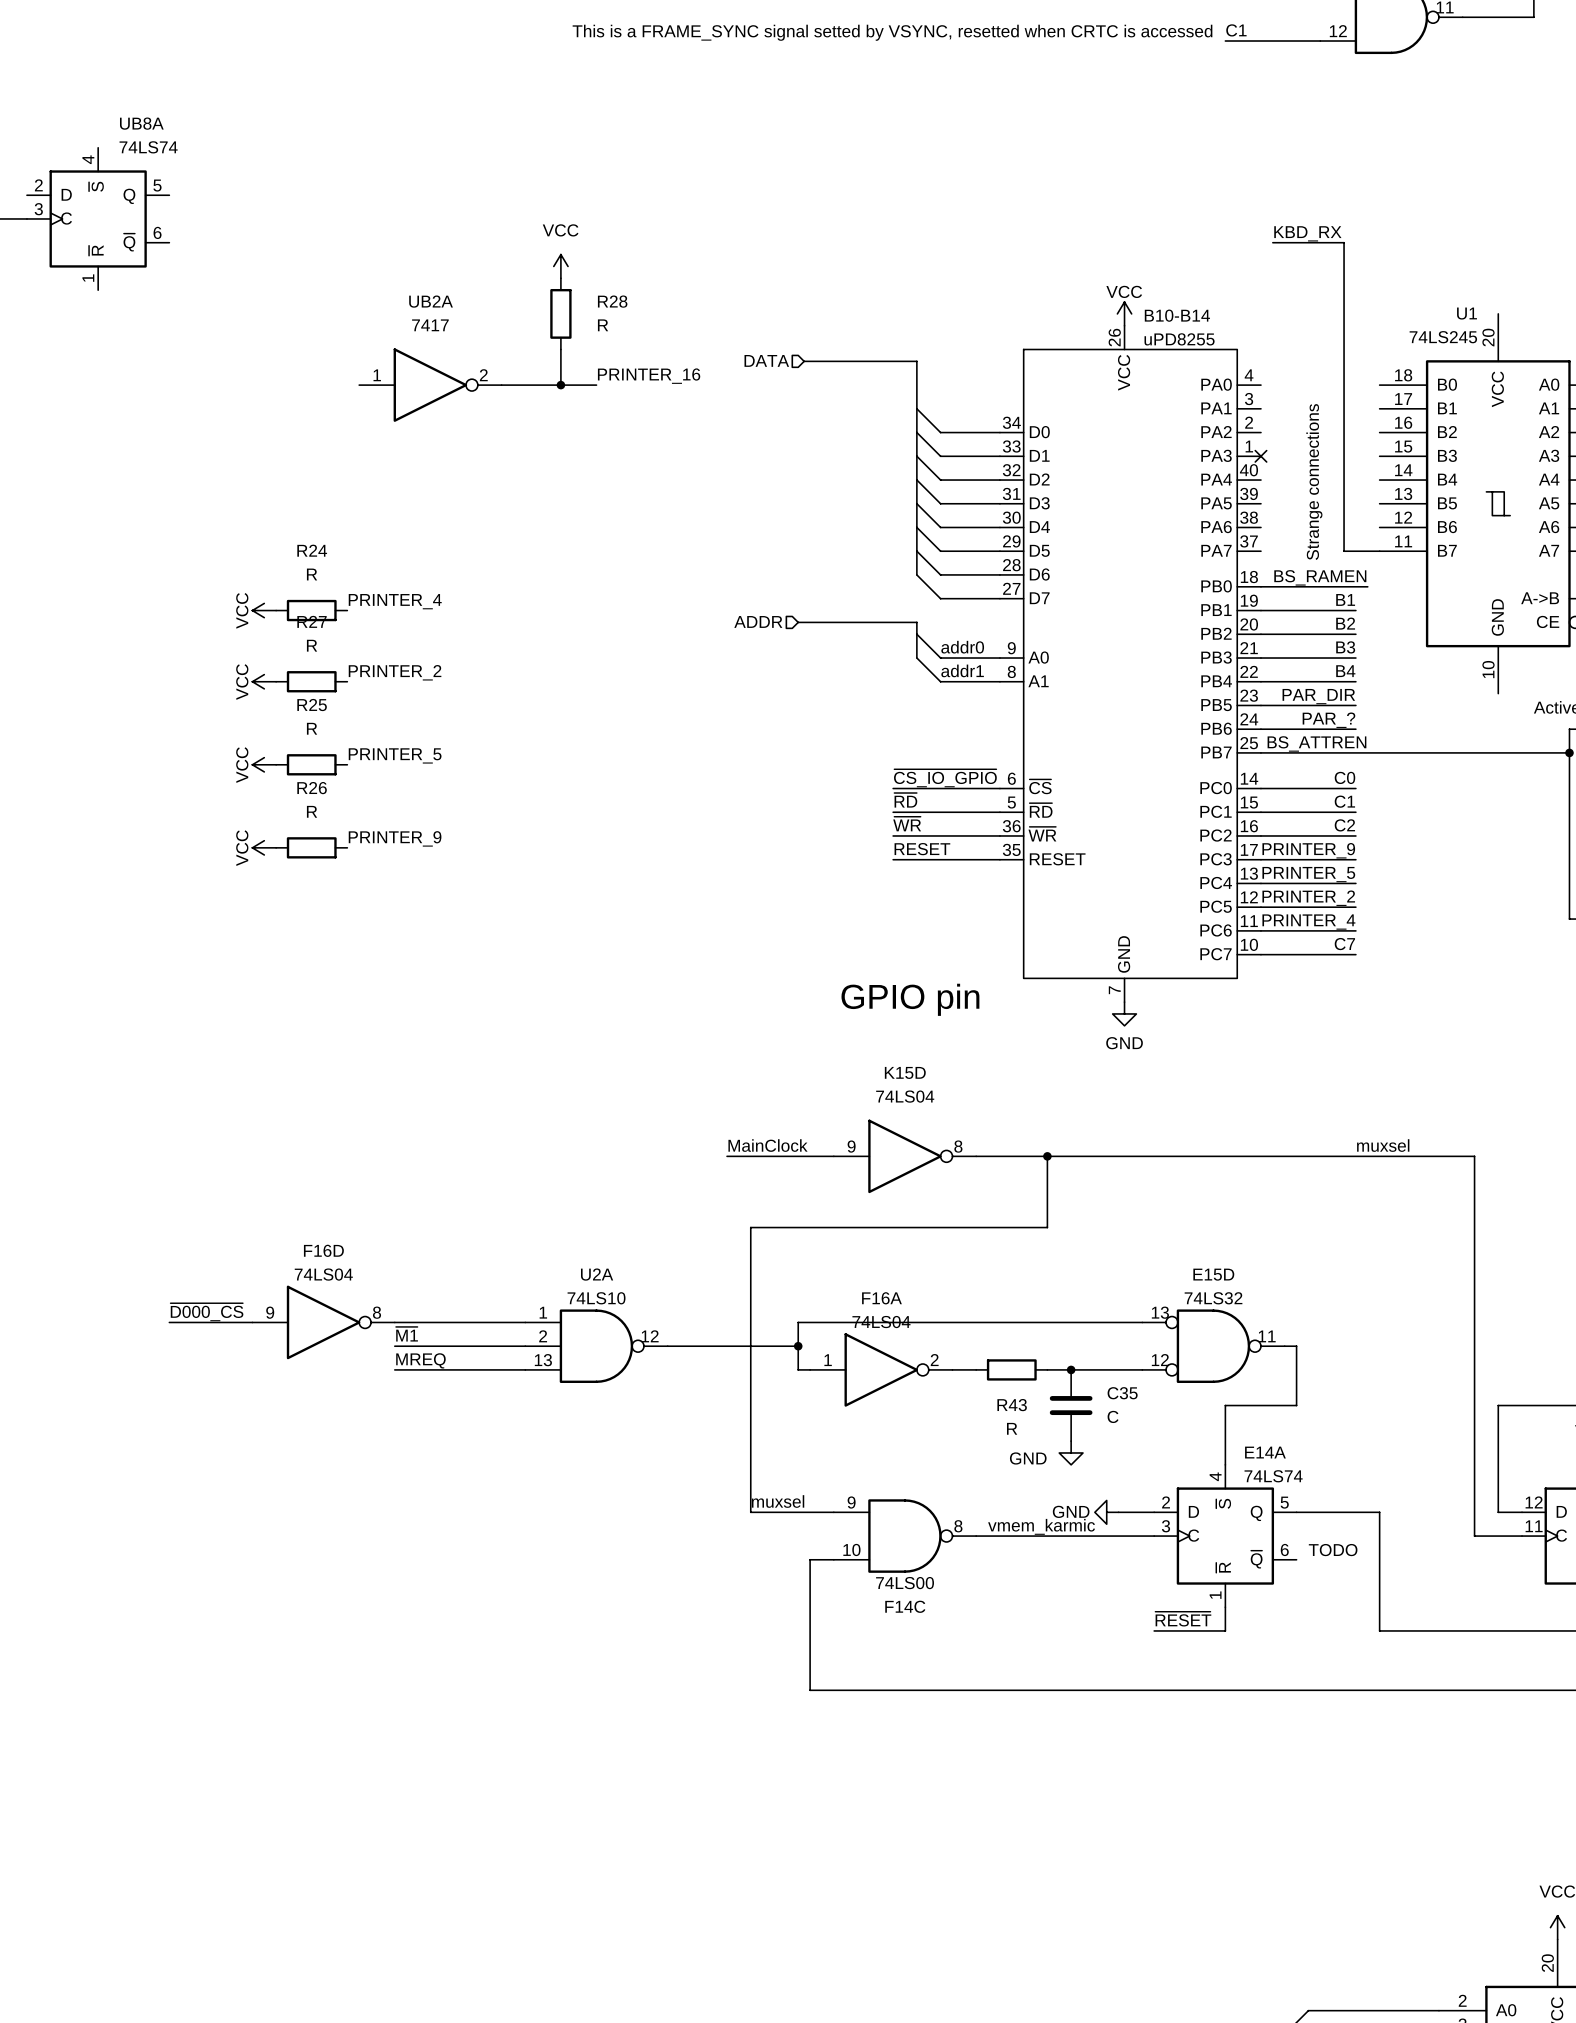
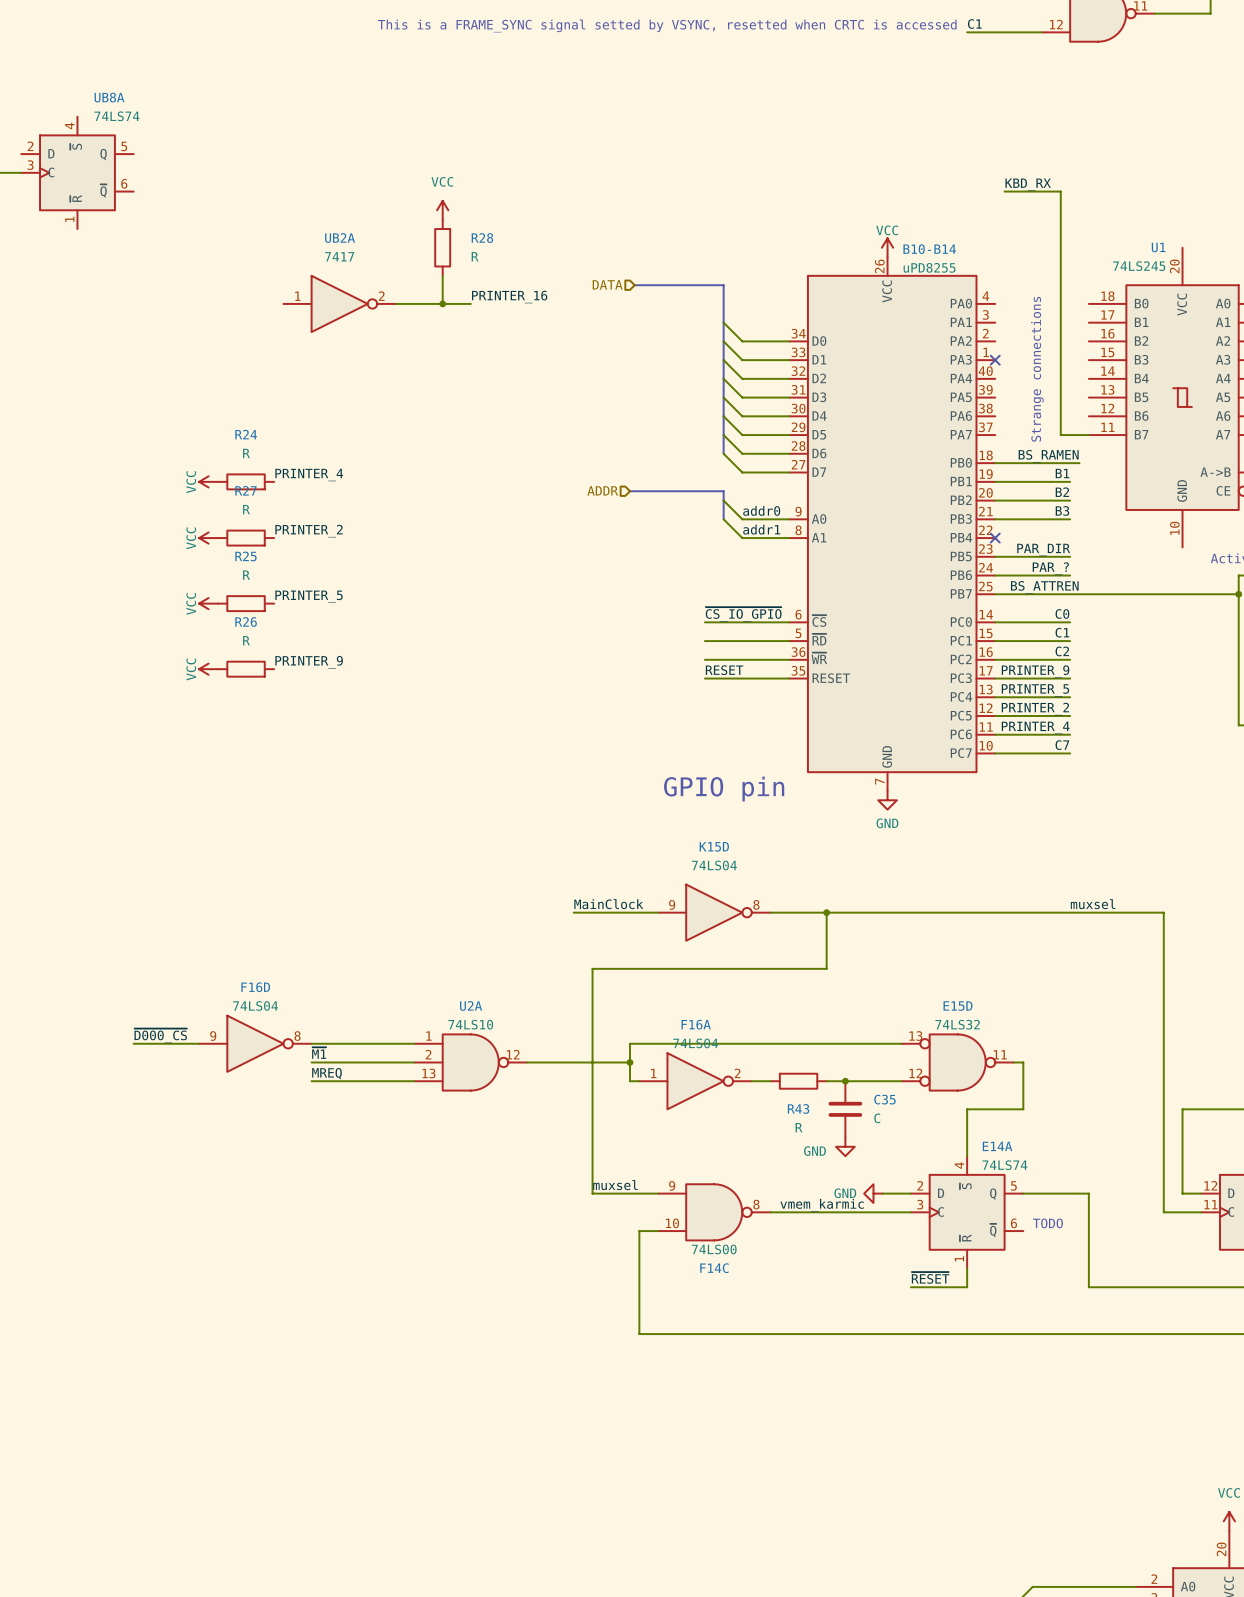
label: B4 (1345, 671) -> none
wire: (1260, 681) (1355, 681) -> none
no-connect mark: none -> (995, 538)
label: ~{RD} (905, 800) -> none
label: ~{WR} (907, 824) -> none

